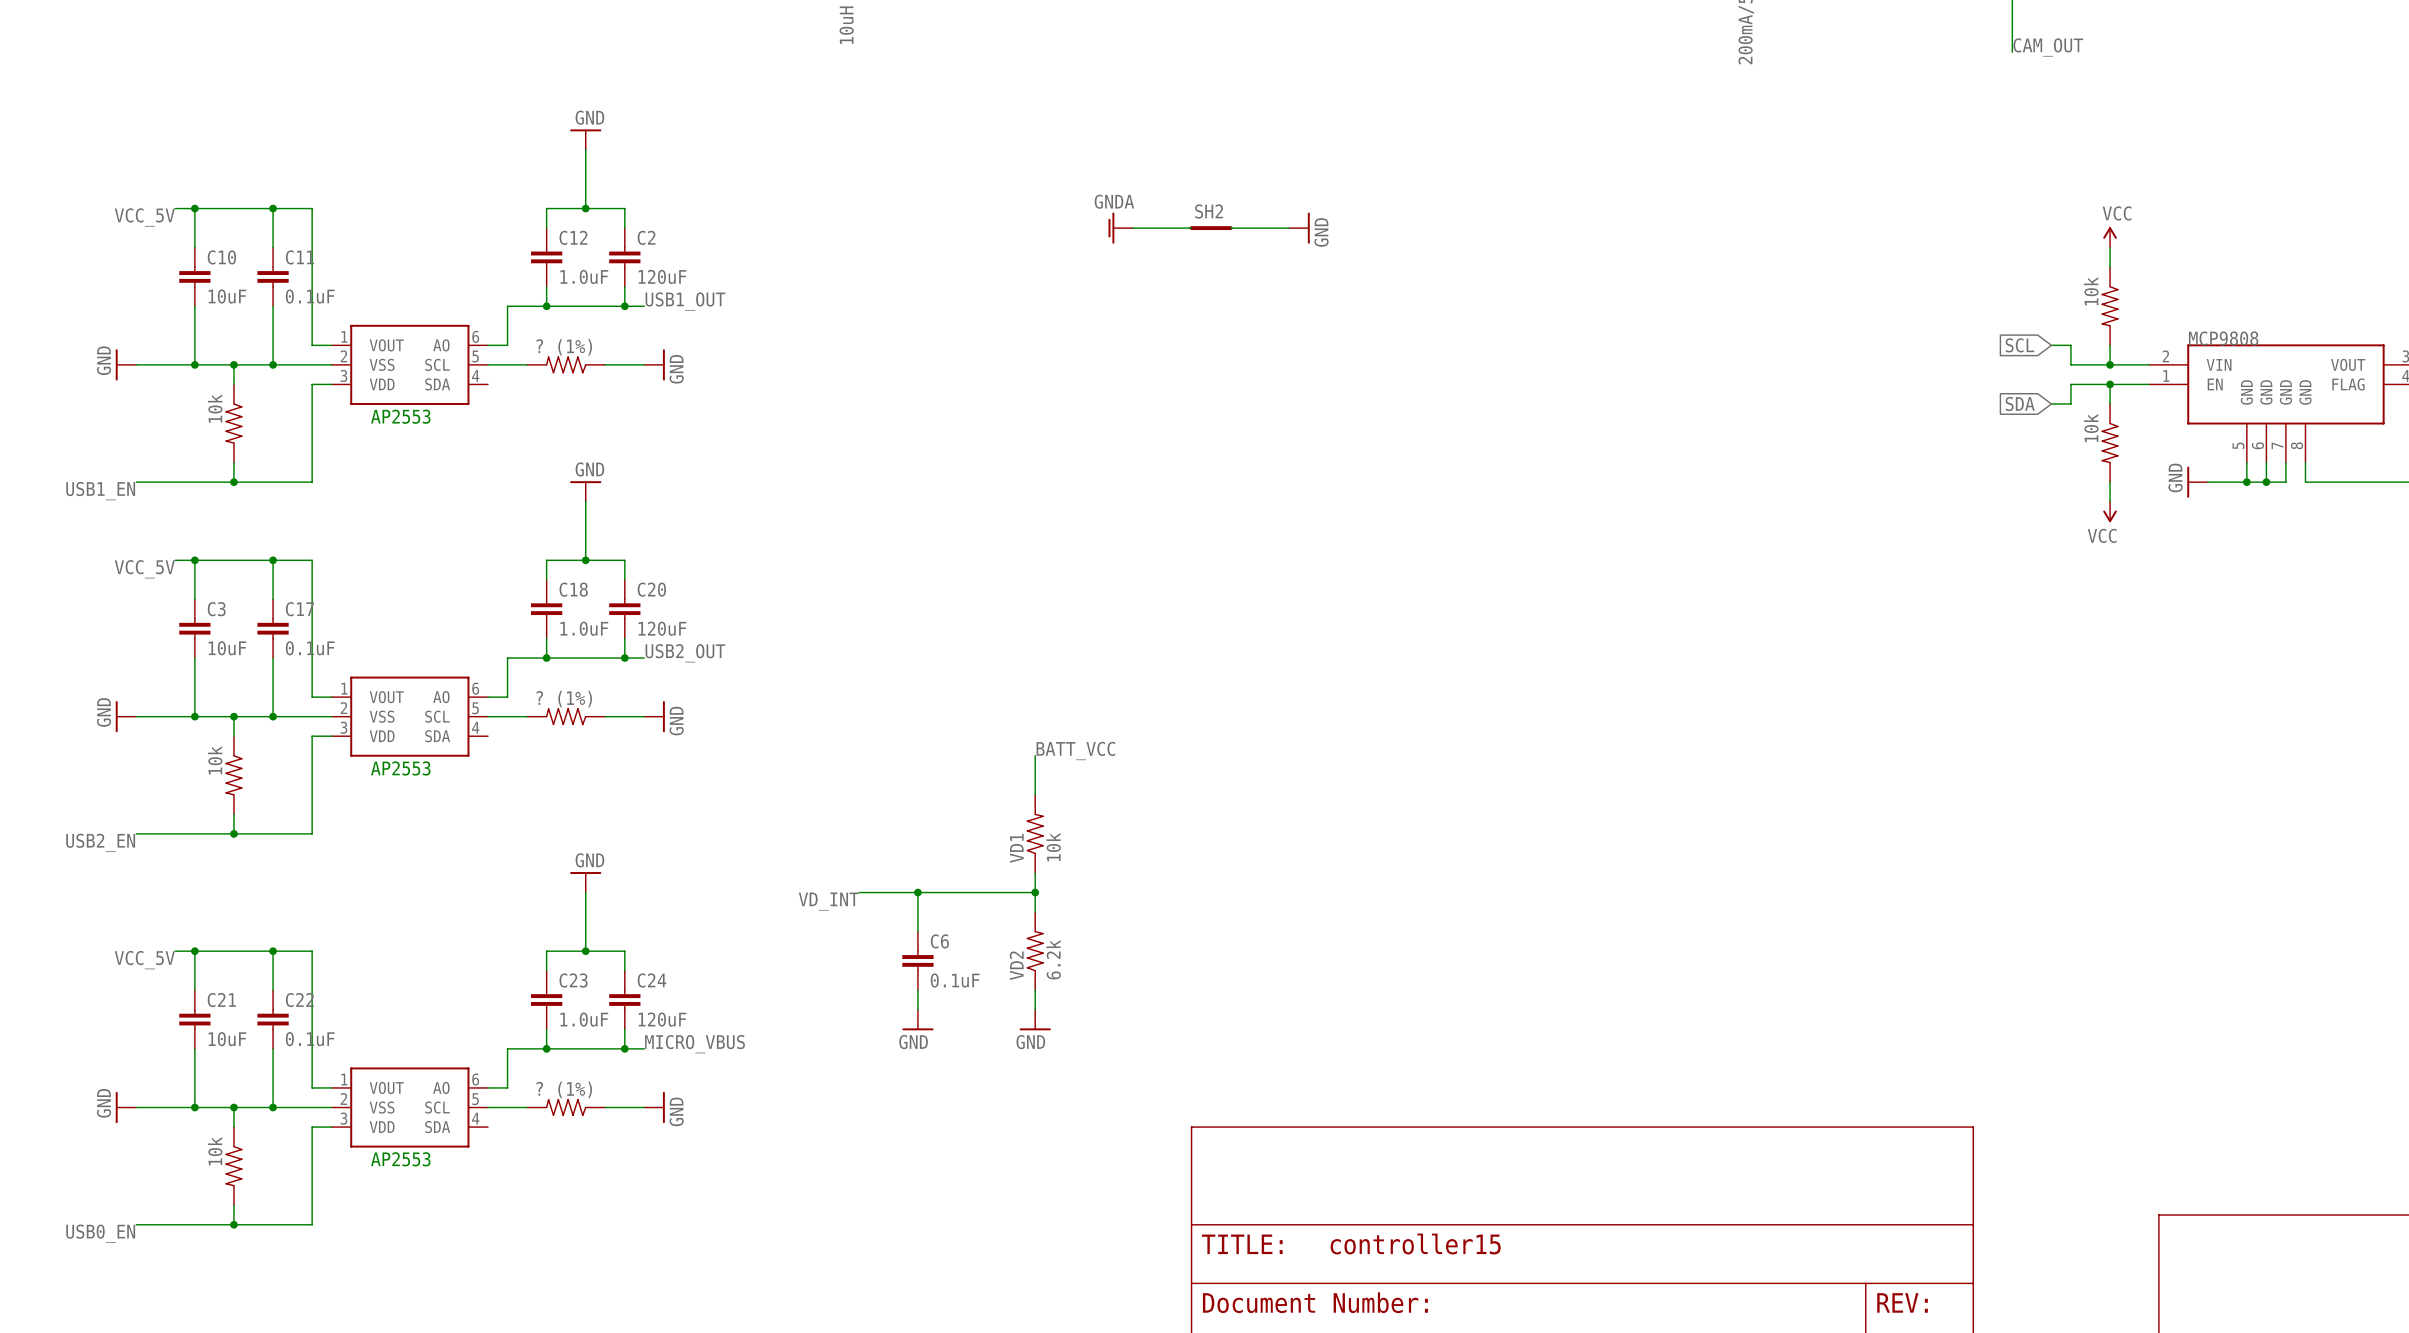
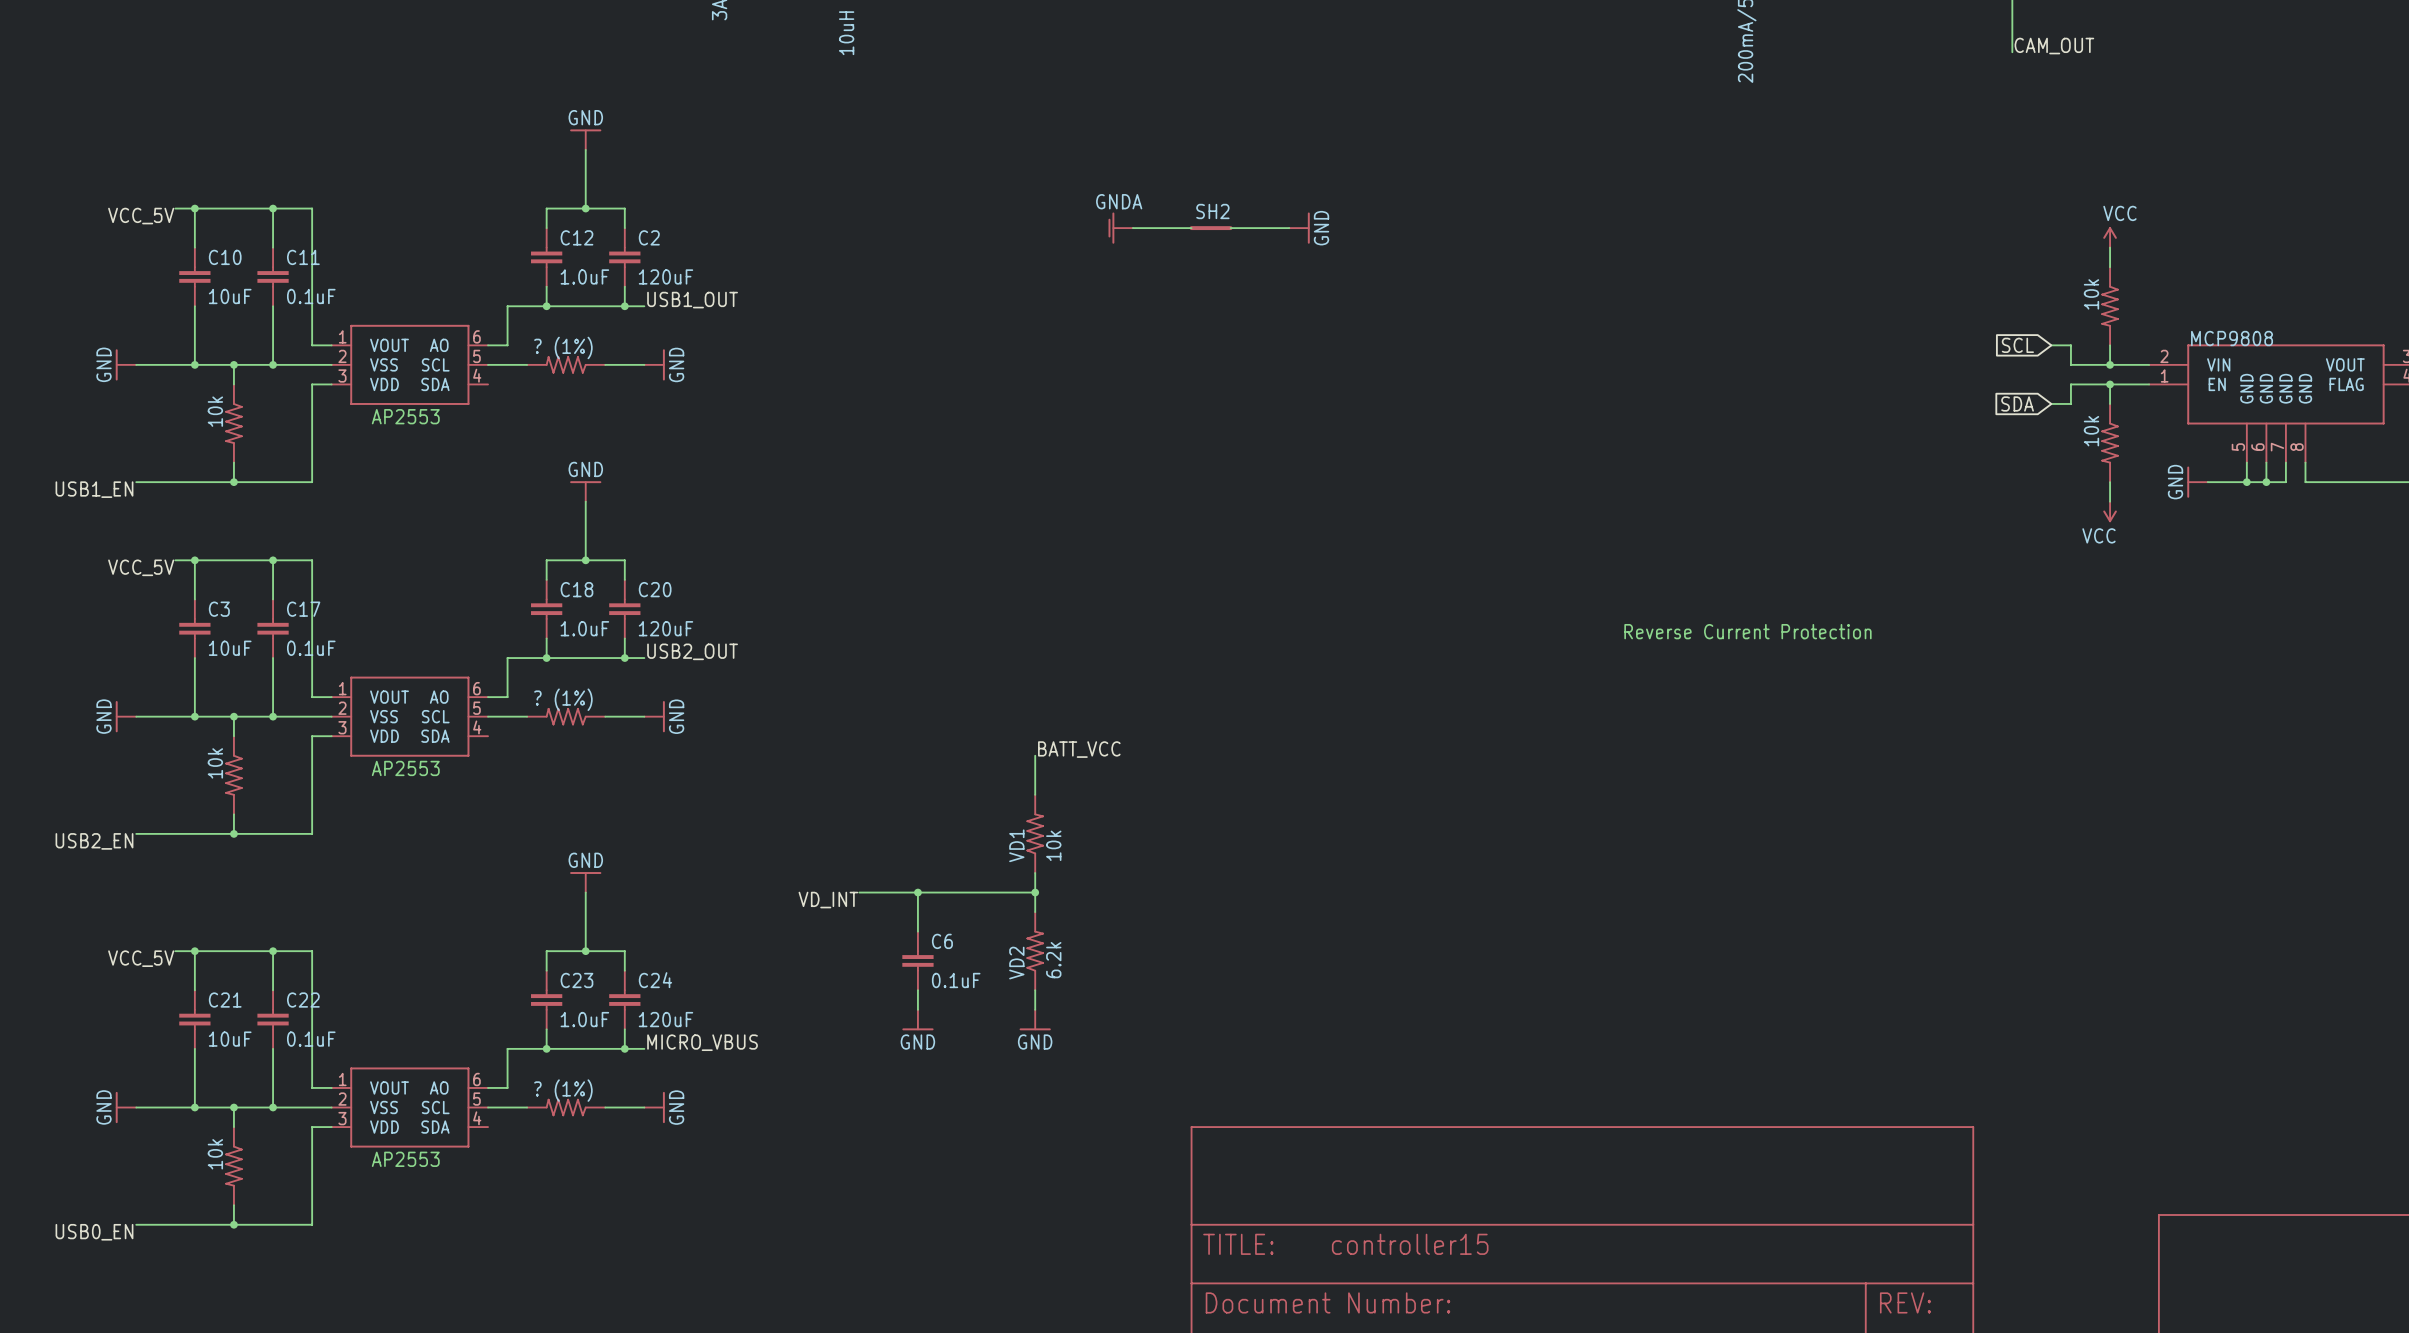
text: none -> Reverse Current Protection (1747, 631)

